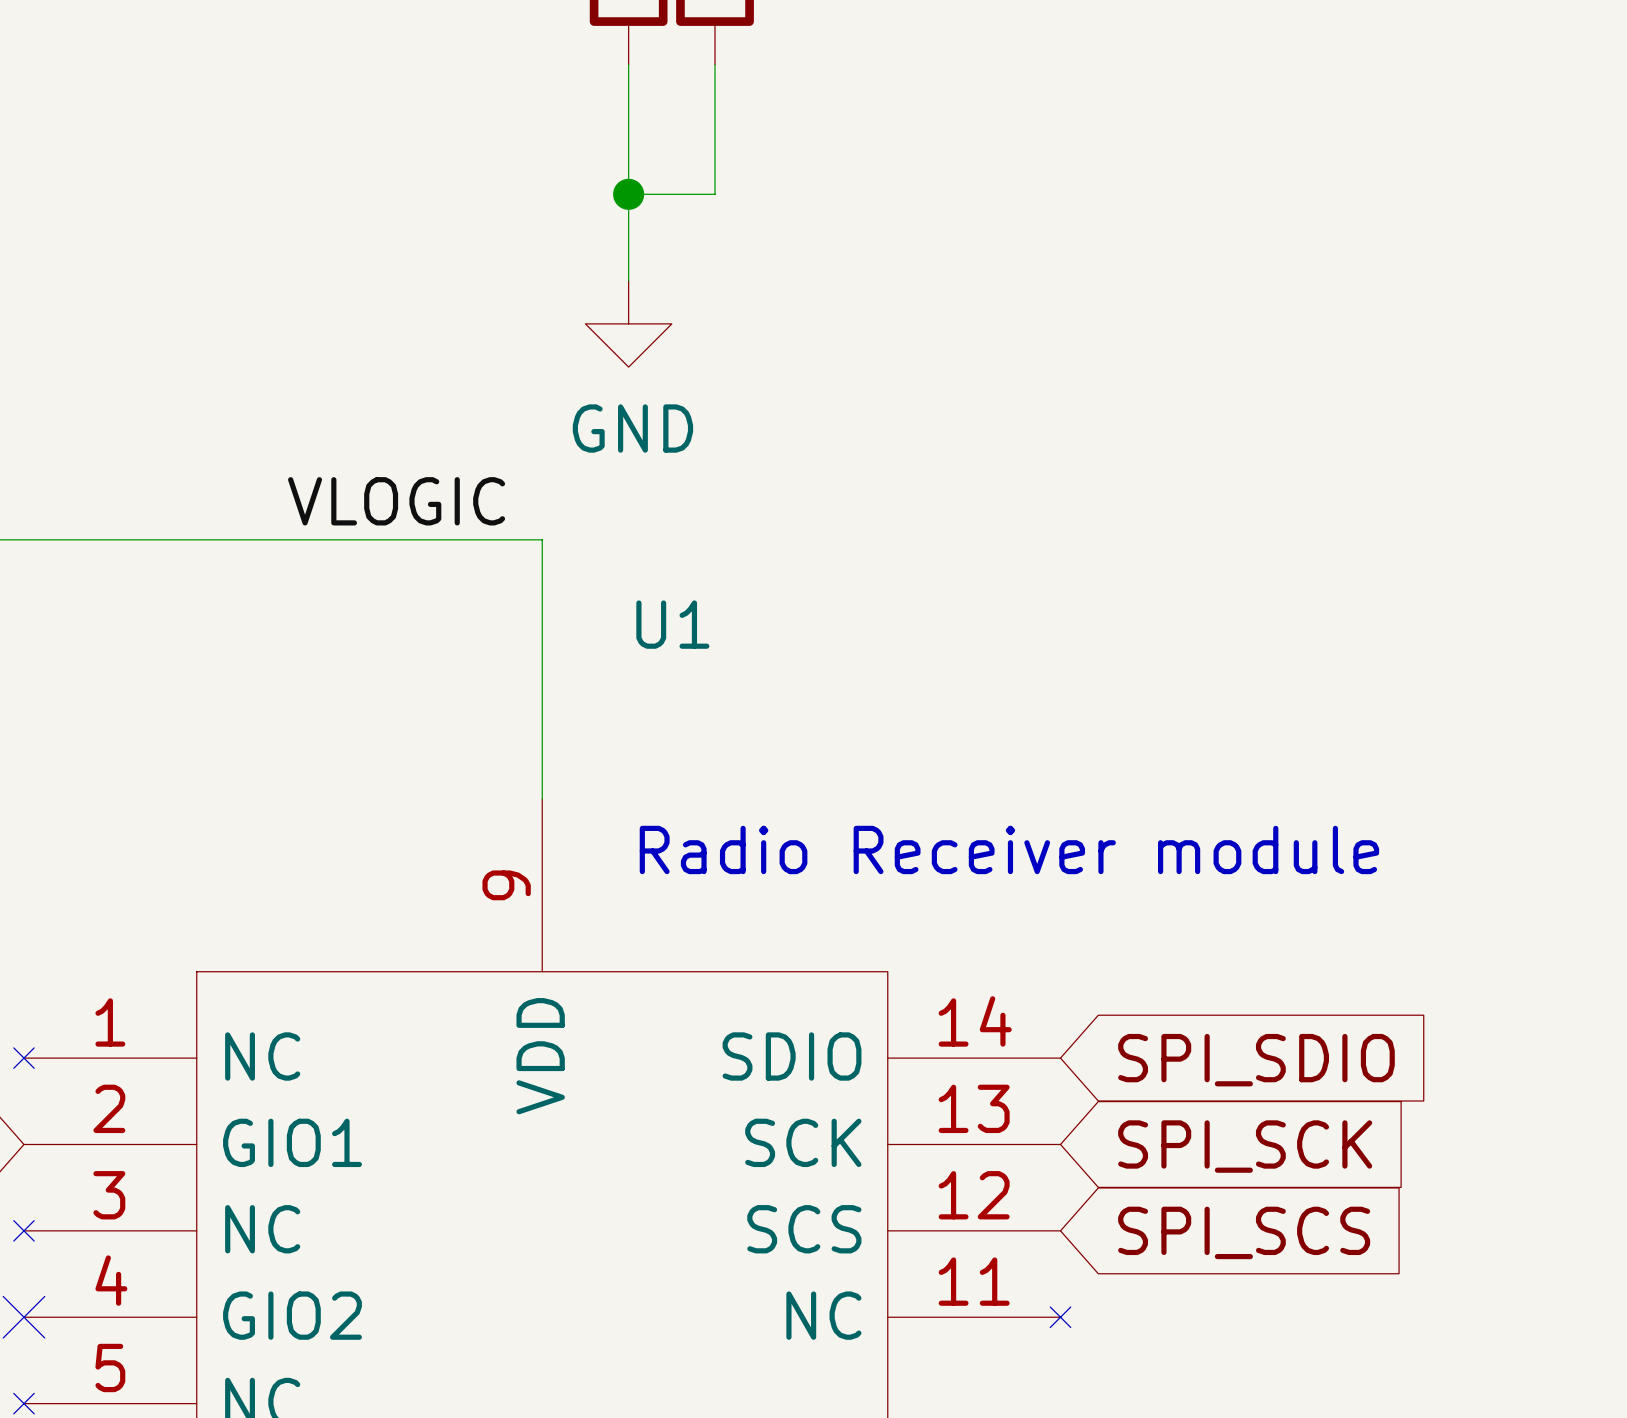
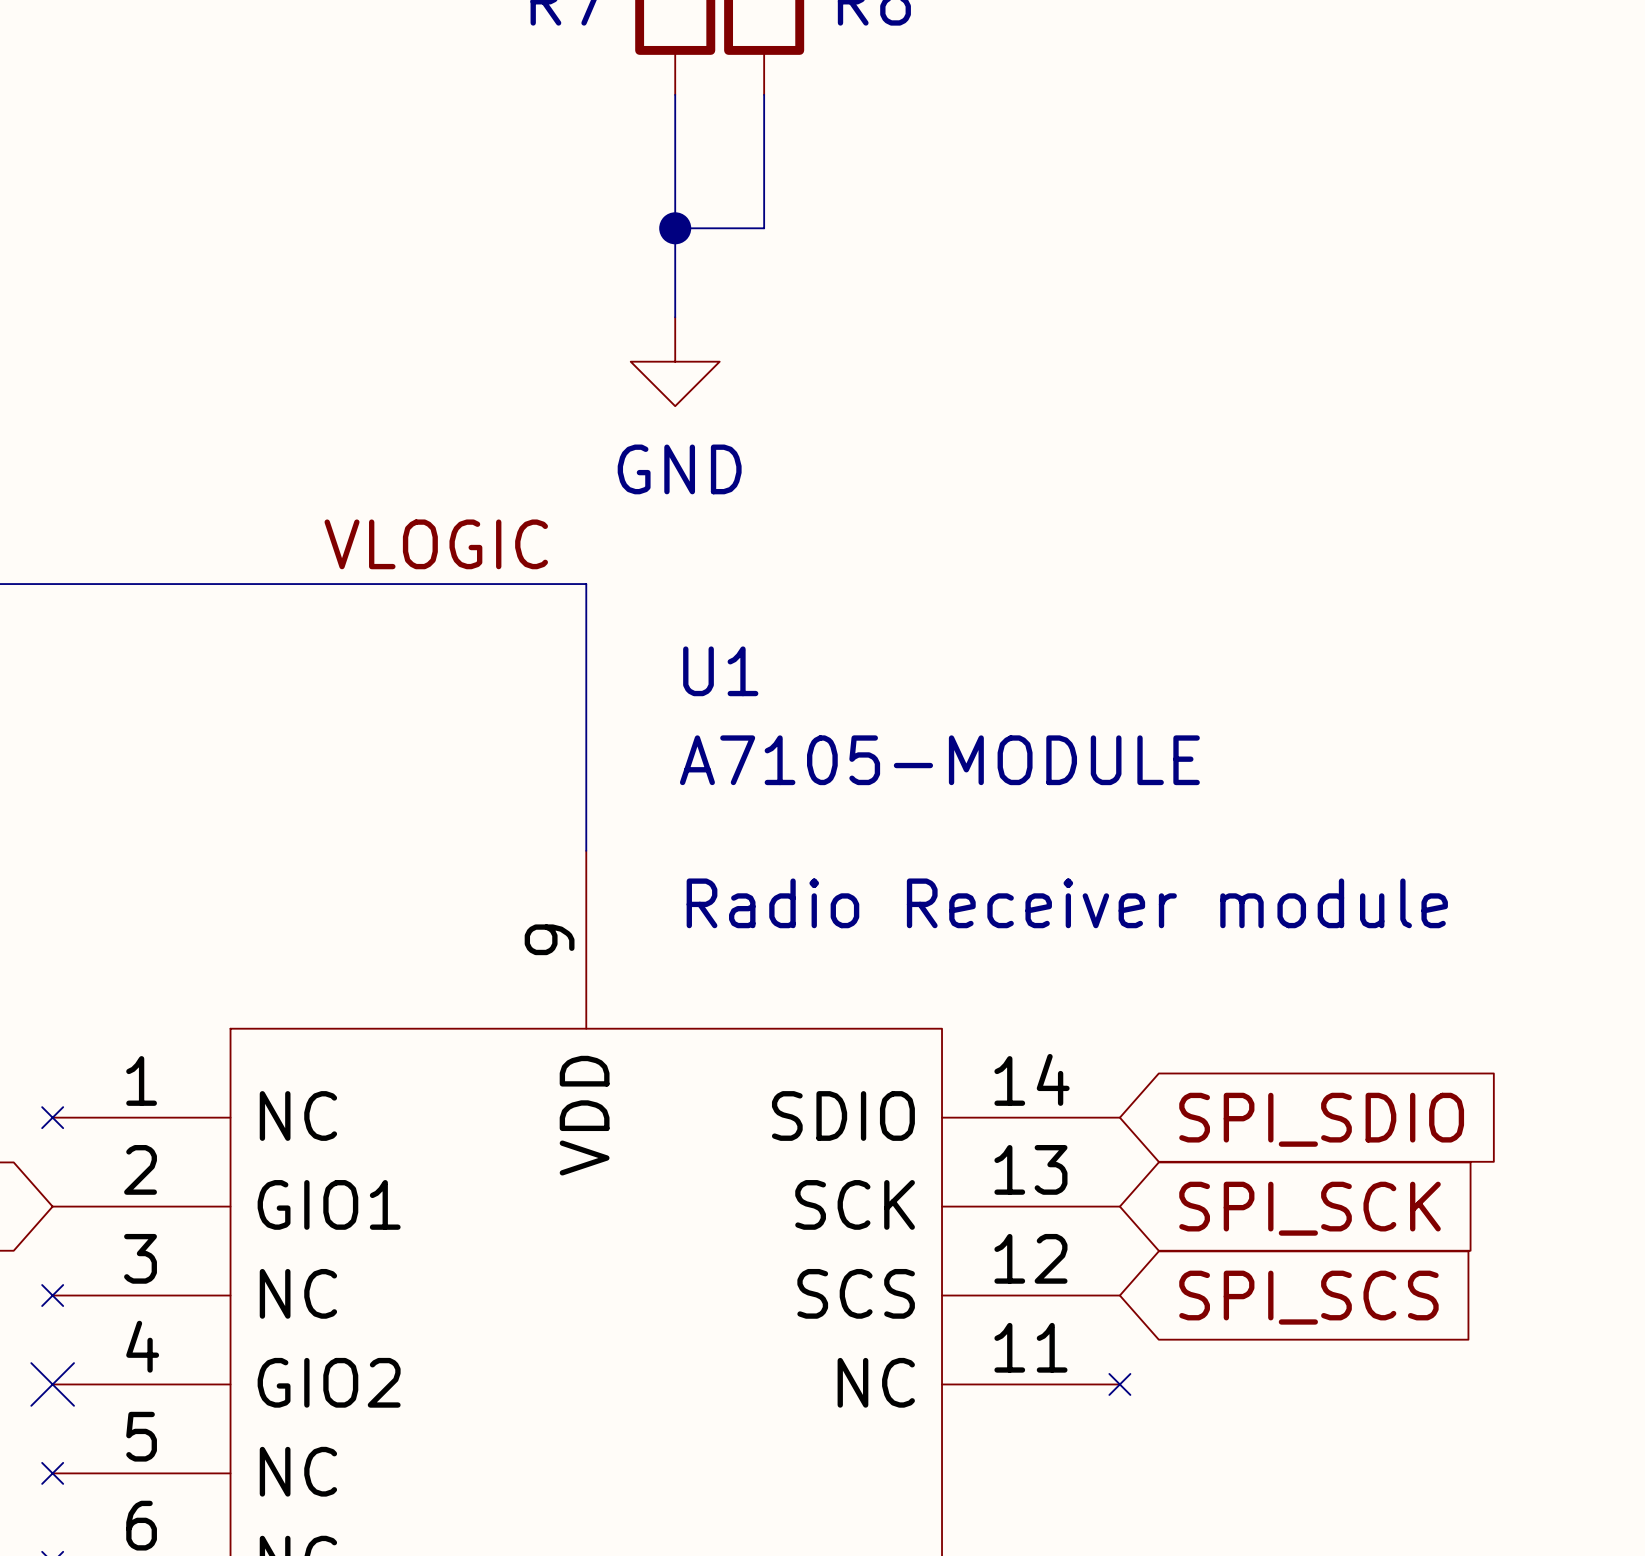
U1 value: none -> A7105-MODULE (939, 760)

